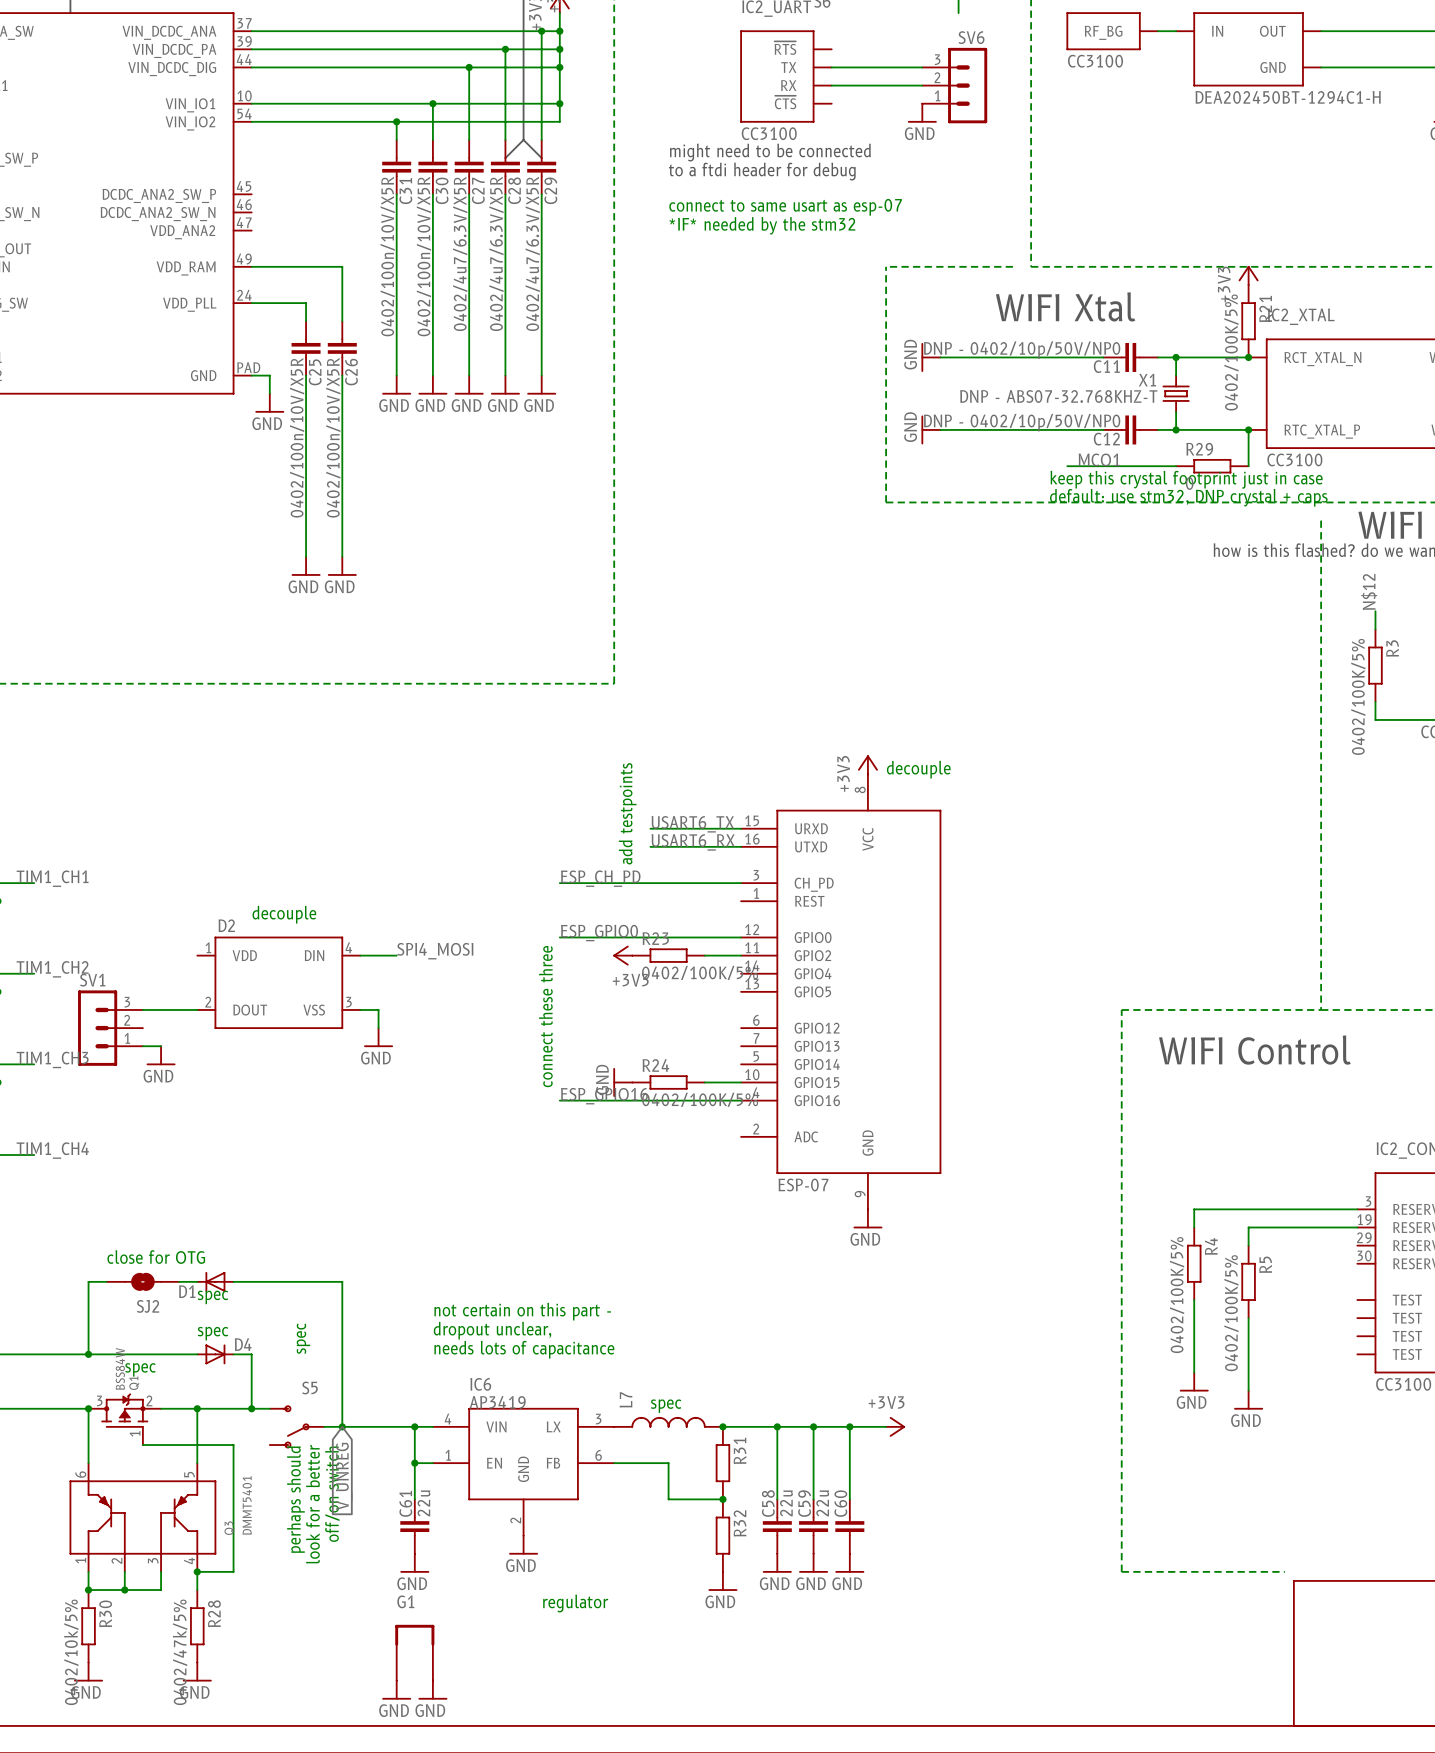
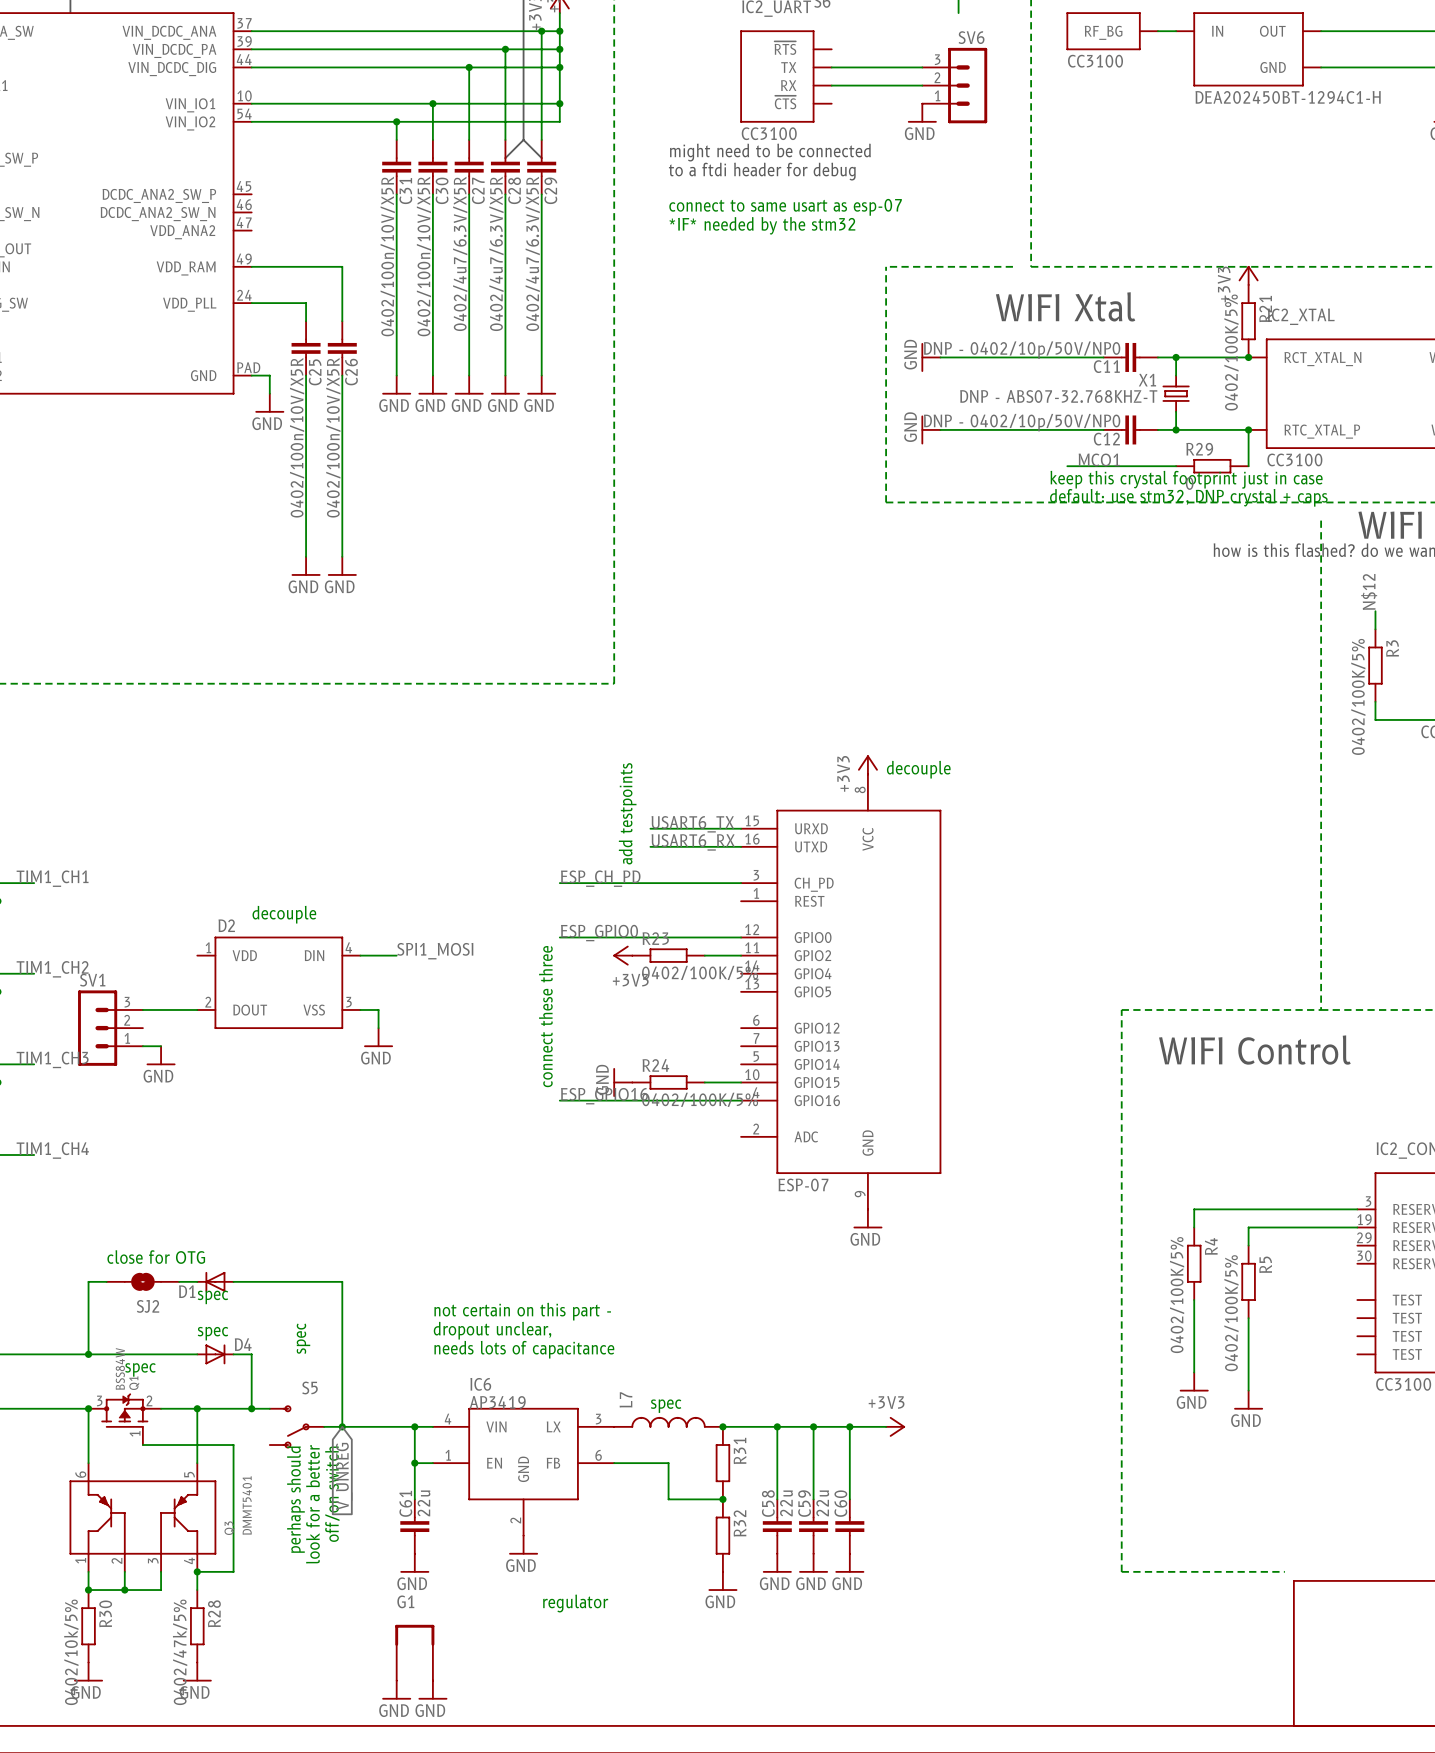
label: SPI4_MOSI (435, 951) -> SPI1_MOSI (435, 951)

